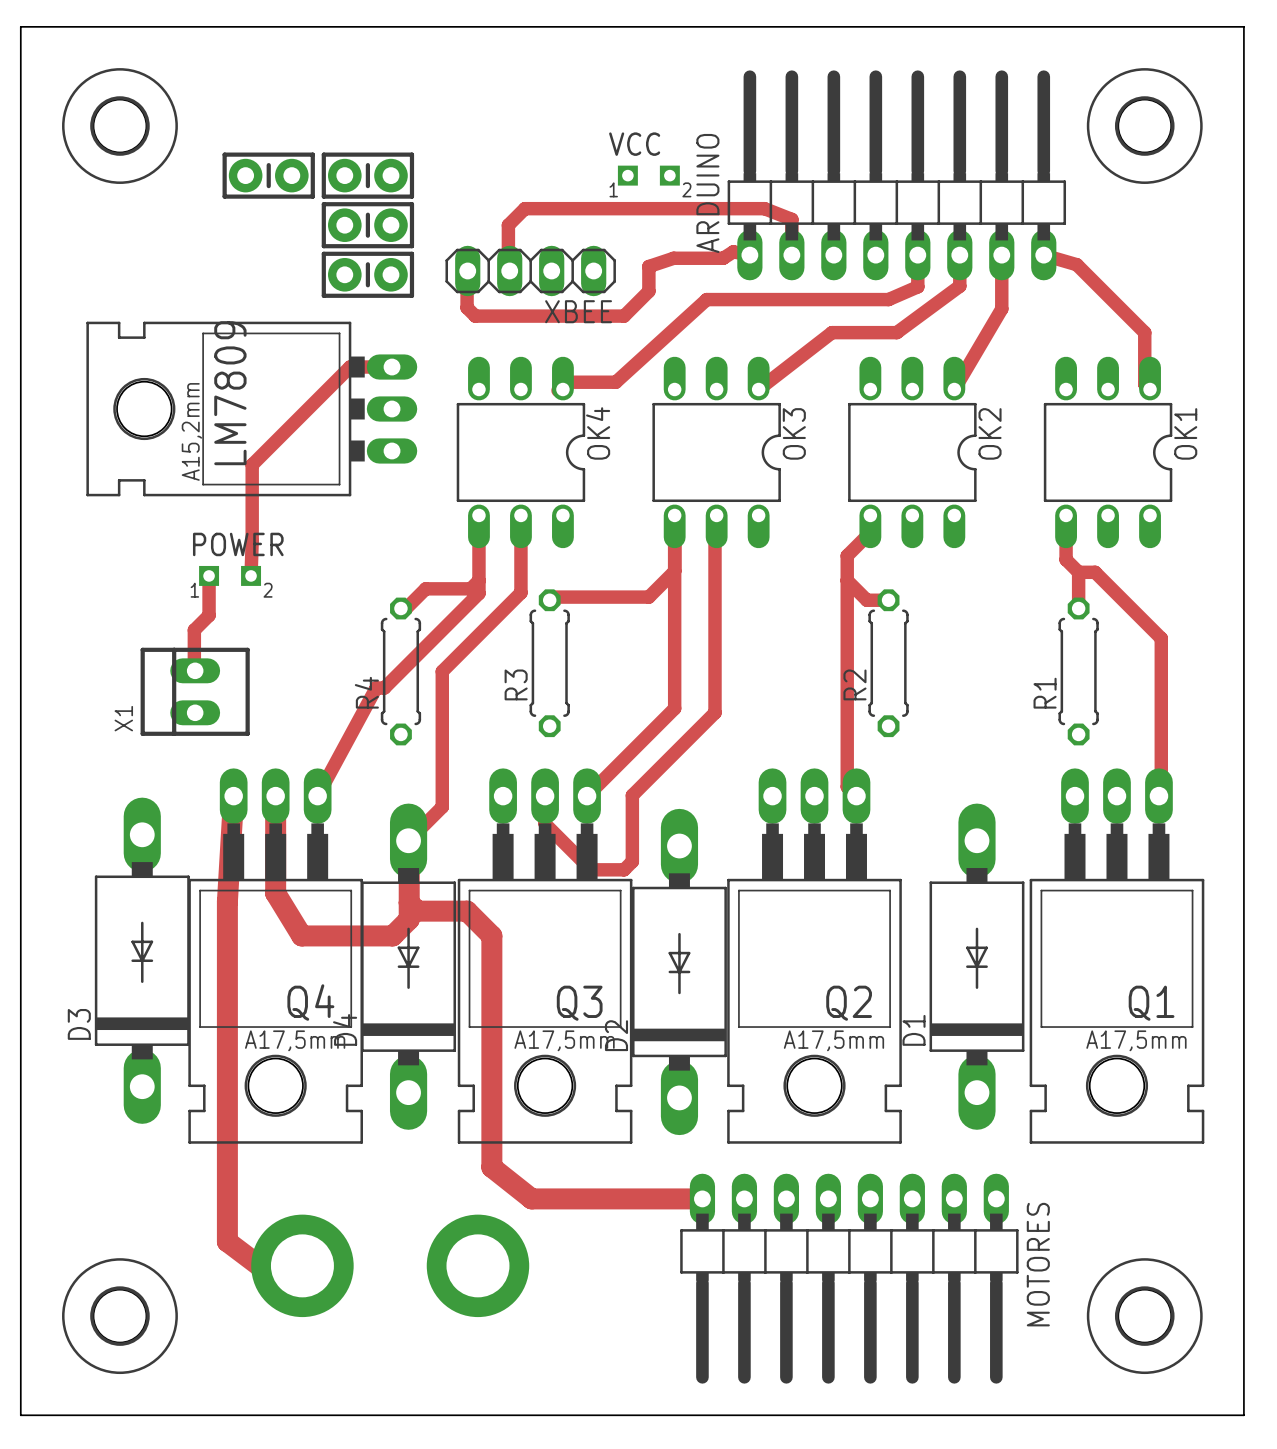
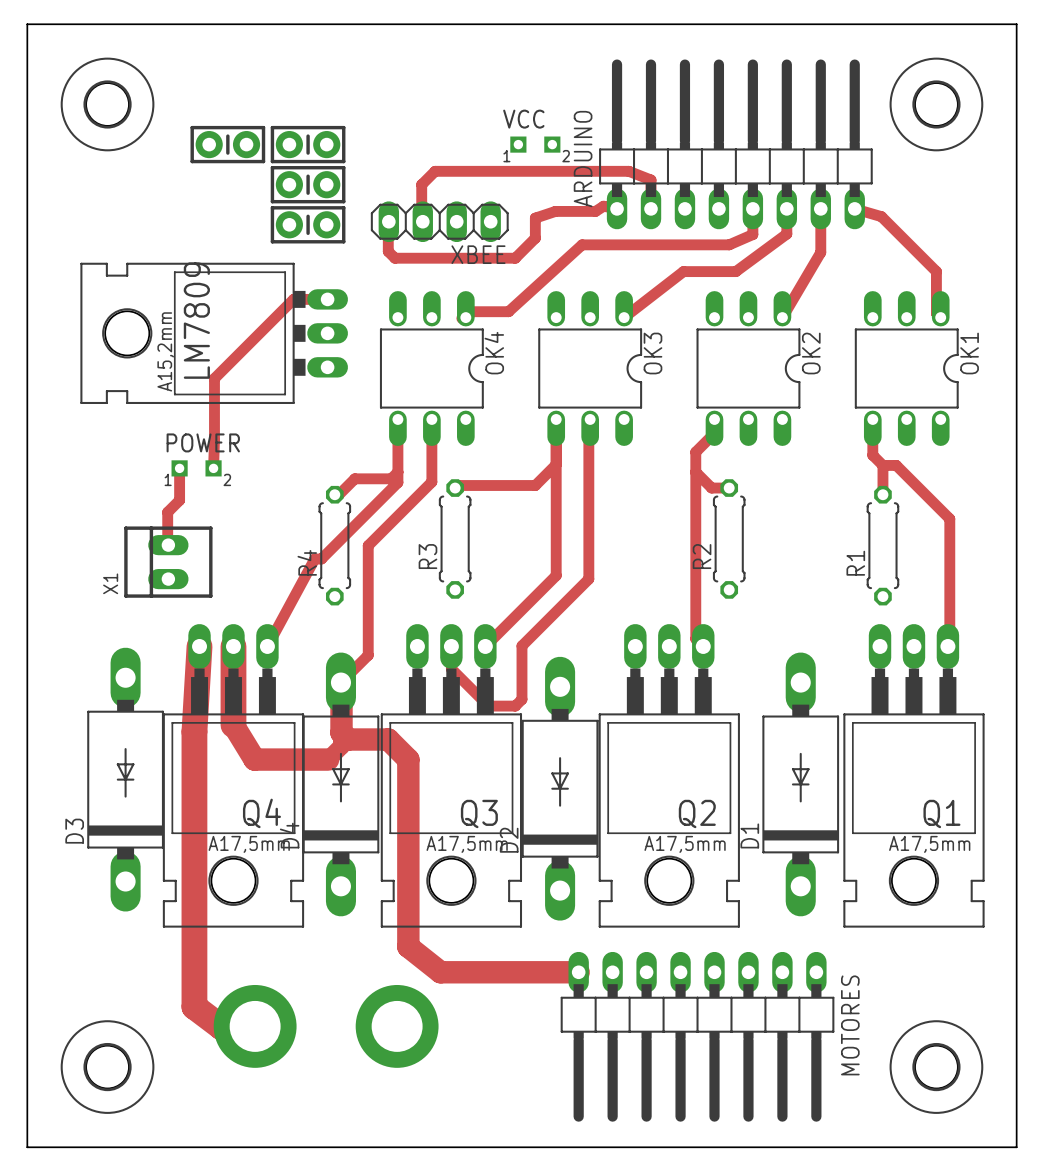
track width: thin (233, 796) (227, 901) (227, 1241) (261, 1267) (302, 1265) -> thick (199, 646) (194, 731) (194, 1006) (221, 1027) (255, 1026)
track width: thin (275, 796) (275, 893) (301, 935) (392, 935) -> thick (233, 646) (233, 725) (254, 759) (328, 759)
track width: thin (409, 841) (409, 902) (417, 911) (467, 911) (491, 935) (491, 1167) (531, 1198) (702, 1198) -> thick (341, 683) (341, 732) (348, 739) (388, 739) (408, 759) (408, 946) (440, 972) (578, 972)

